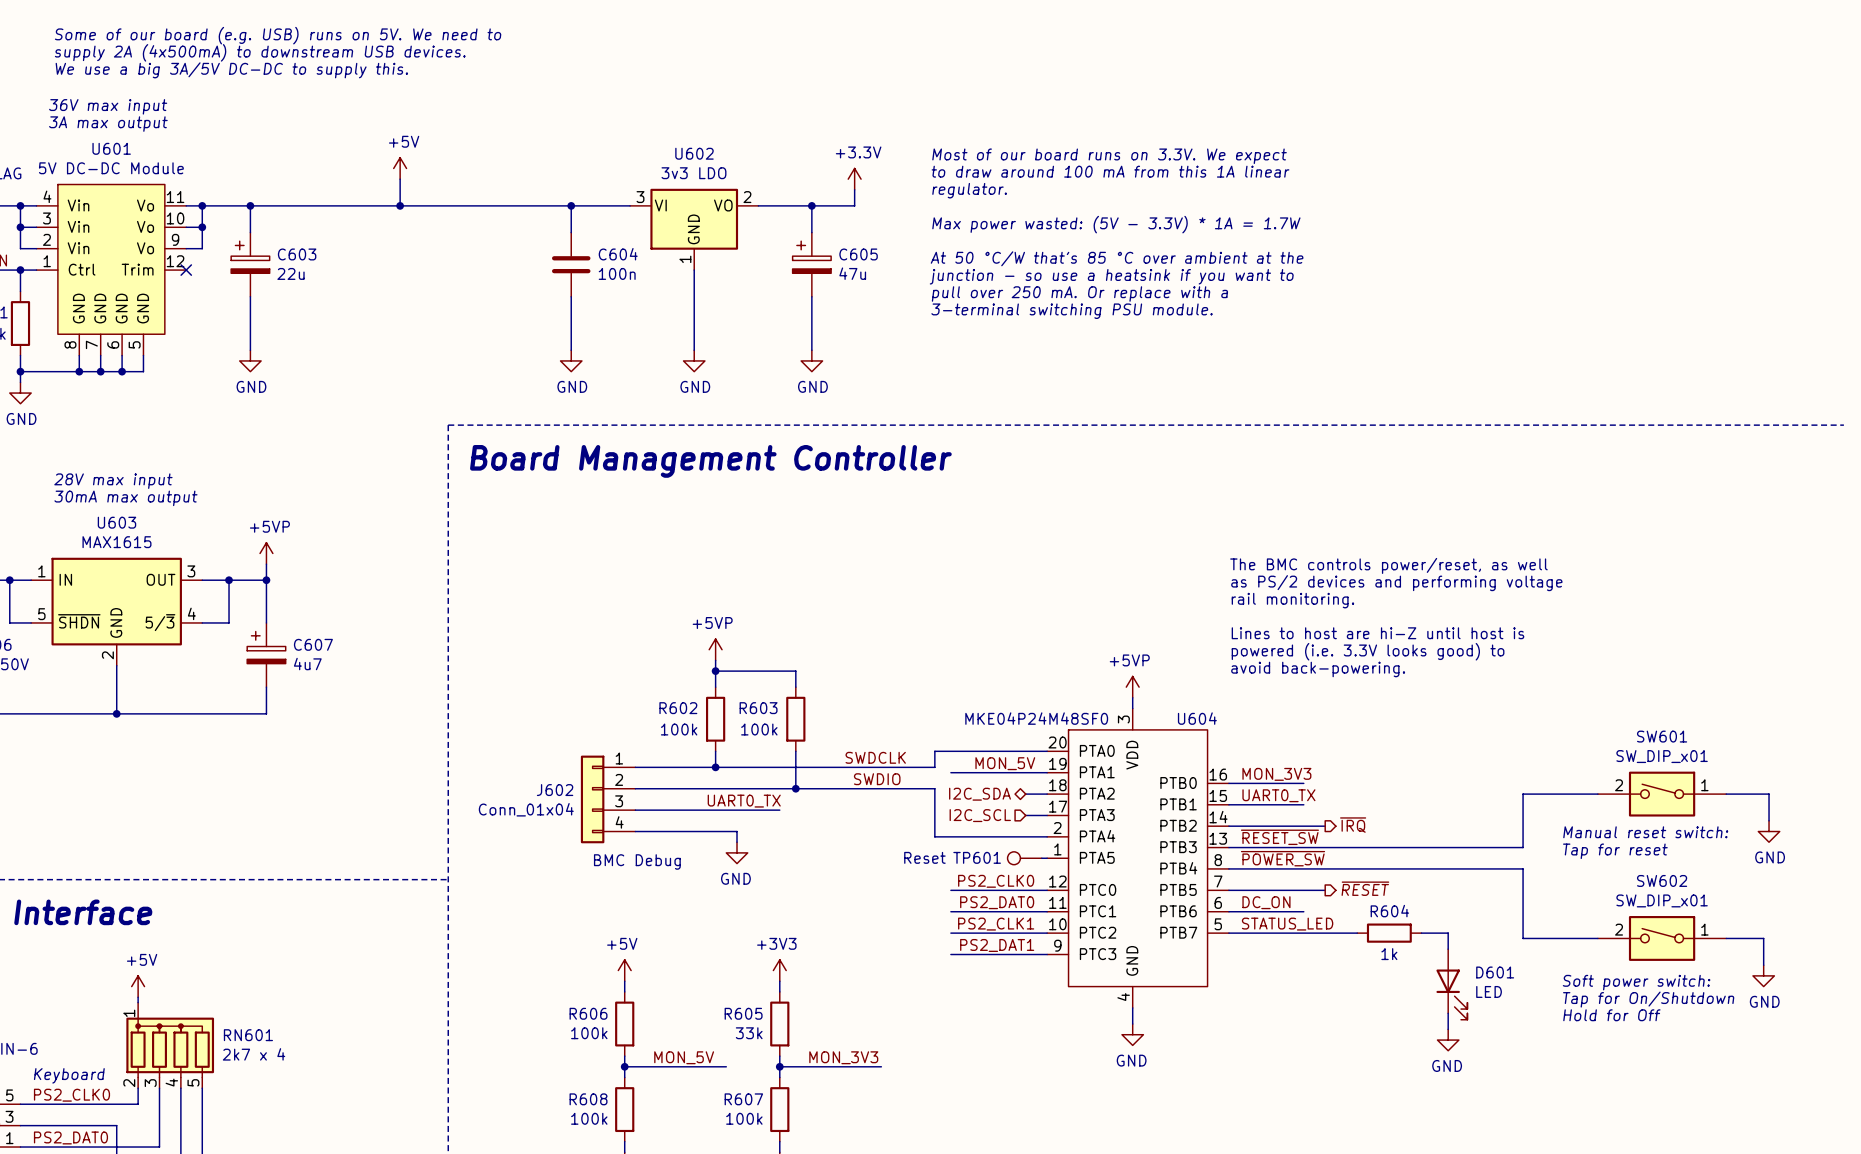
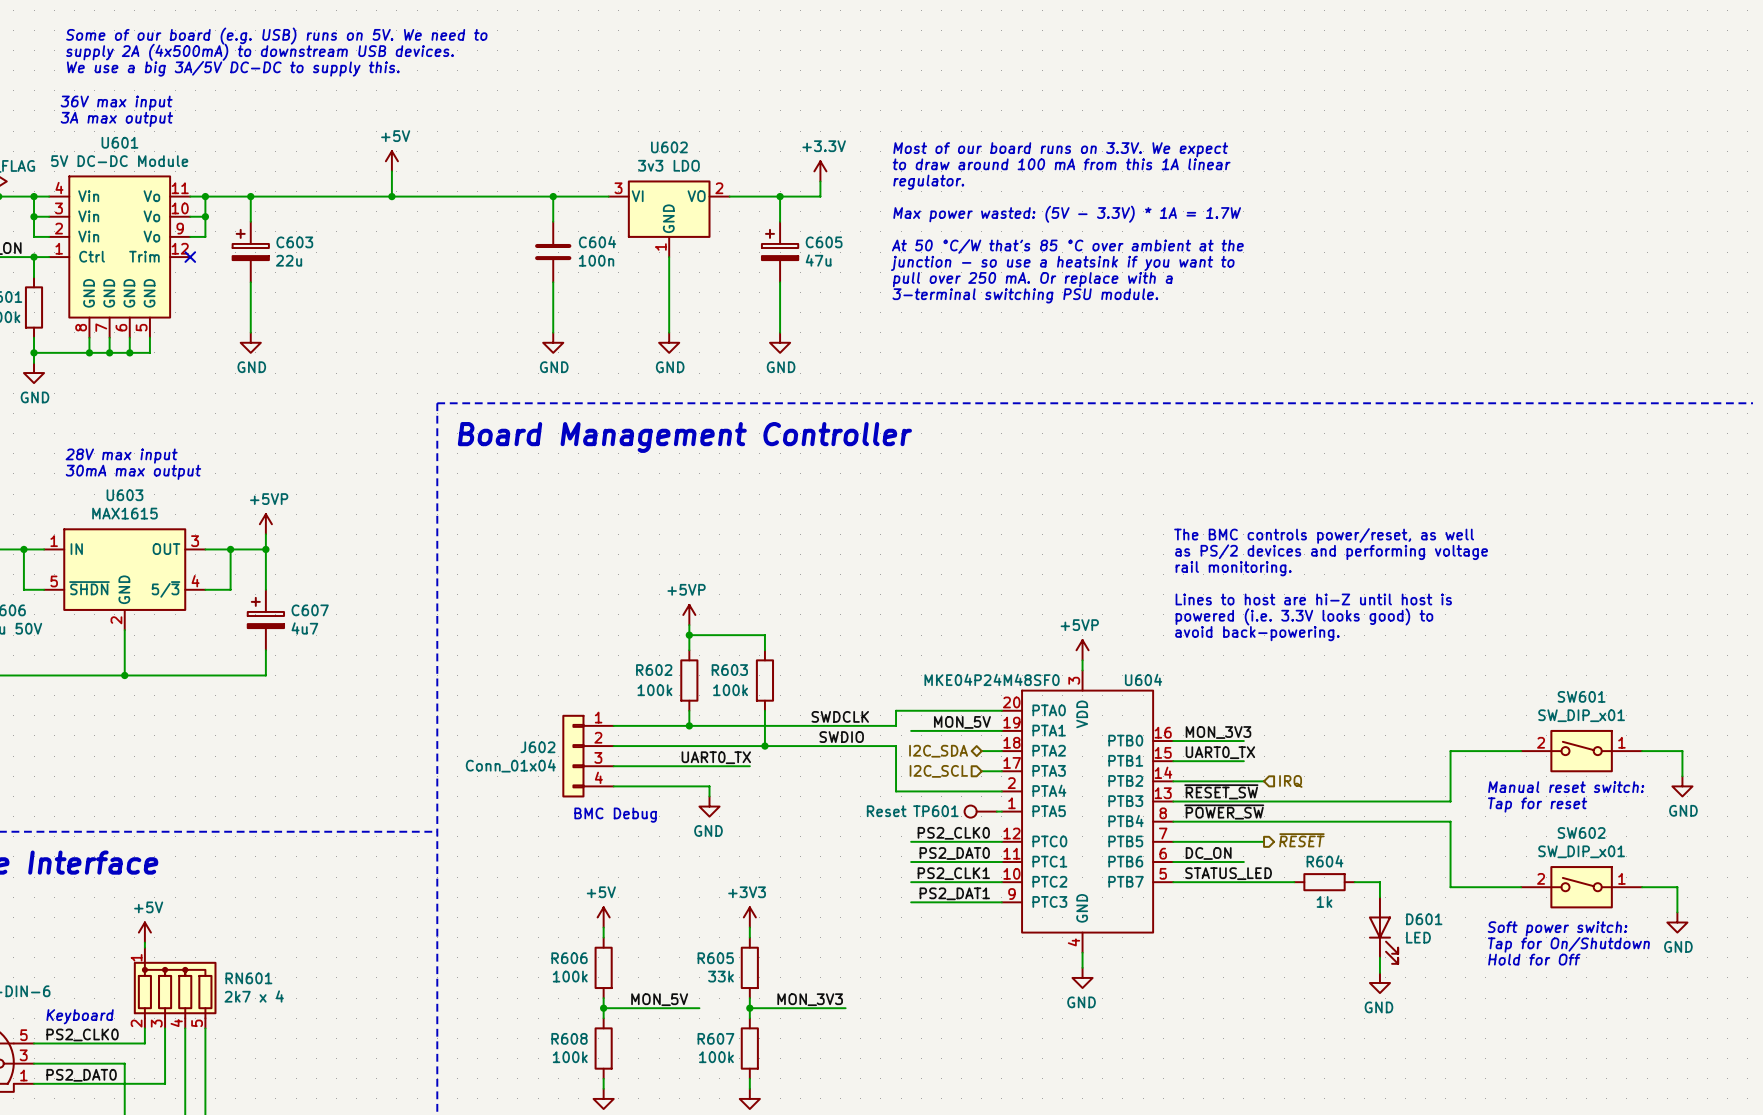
hierarchical label shape: output (1353, 825) -> input (1290, 781)
hierarchical label: ~{IRQ} (1353, 825) -> IRQ (1290, 781)

